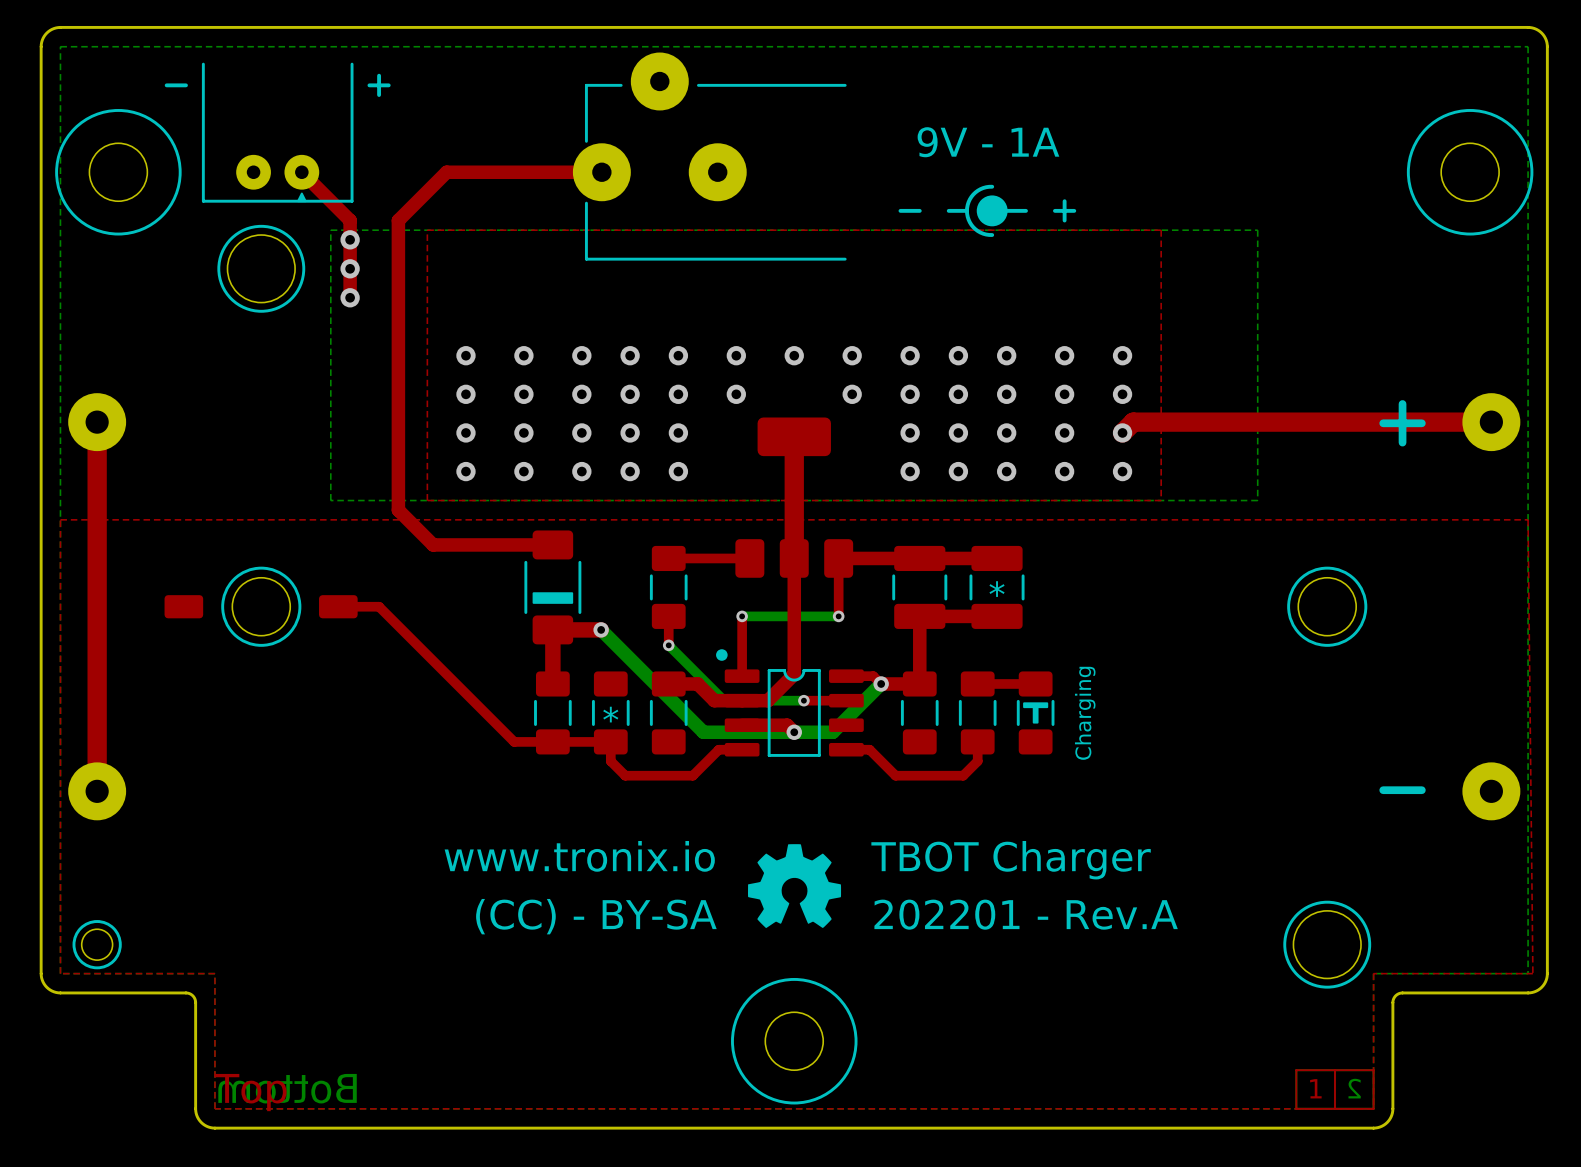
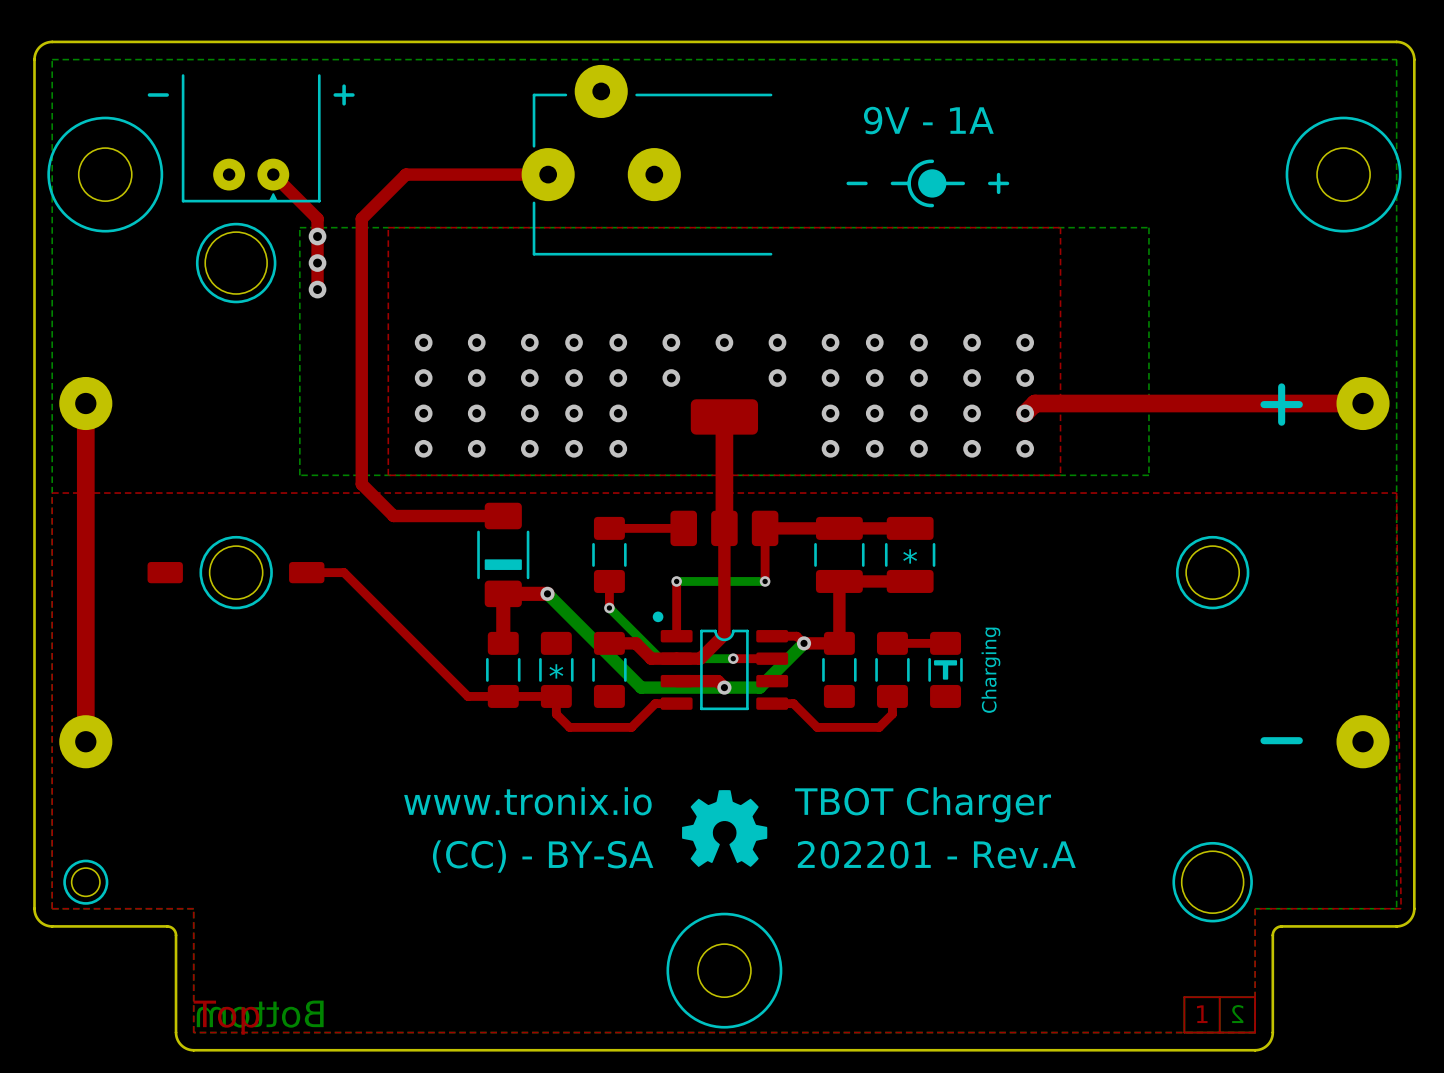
text position: 9V - 1A (988, 142) -> 9V - 1A (928, 120)
line: (992, 186) (983, 188) (975, 192) (968, 202) (966, 210) (968, 219) (973, 227) (983, 233) (992, 235) -> (932, 161) (921, 163) (915, 168) (910, 175) (909, 183) (910, 191) (915, 198) (924, 204) (932, 205)
line: (1064, 201) (1064, 220) -> (998, 174) (998, 192)
line: (900, 210) (919, 210) -> (848, 183) (865, 183)
line: (948, 210) (966, 210) -> (892, 183) (909, 183)
drawing position: (992, 210) -> (932, 183)
line: (1006, 210) (1025, 210) -> (945, 183) (963, 183)
line: (1054, 210) (1074, 210) -> (989, 183) (1007, 183)

